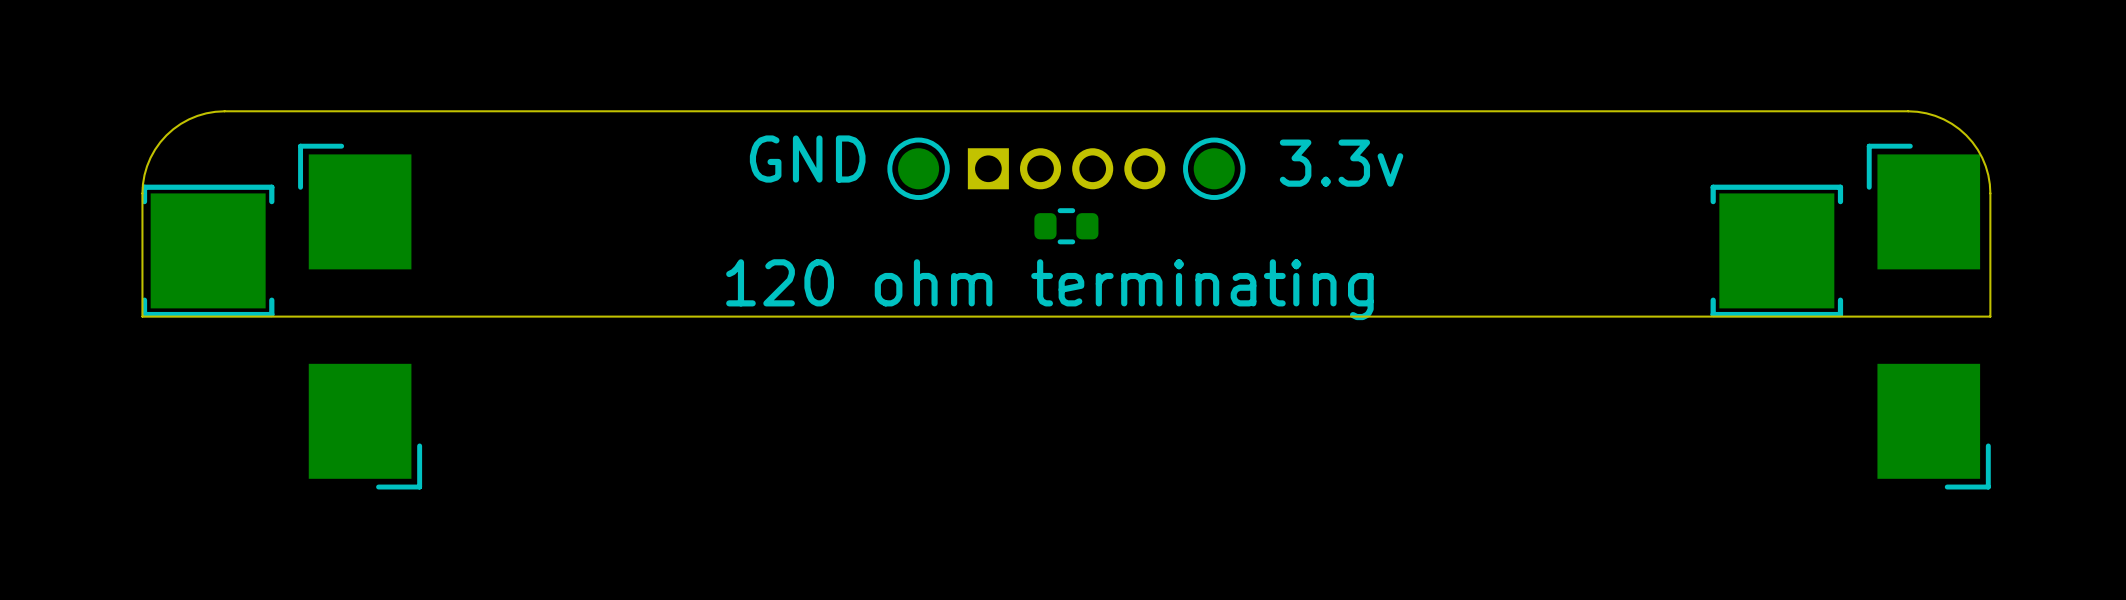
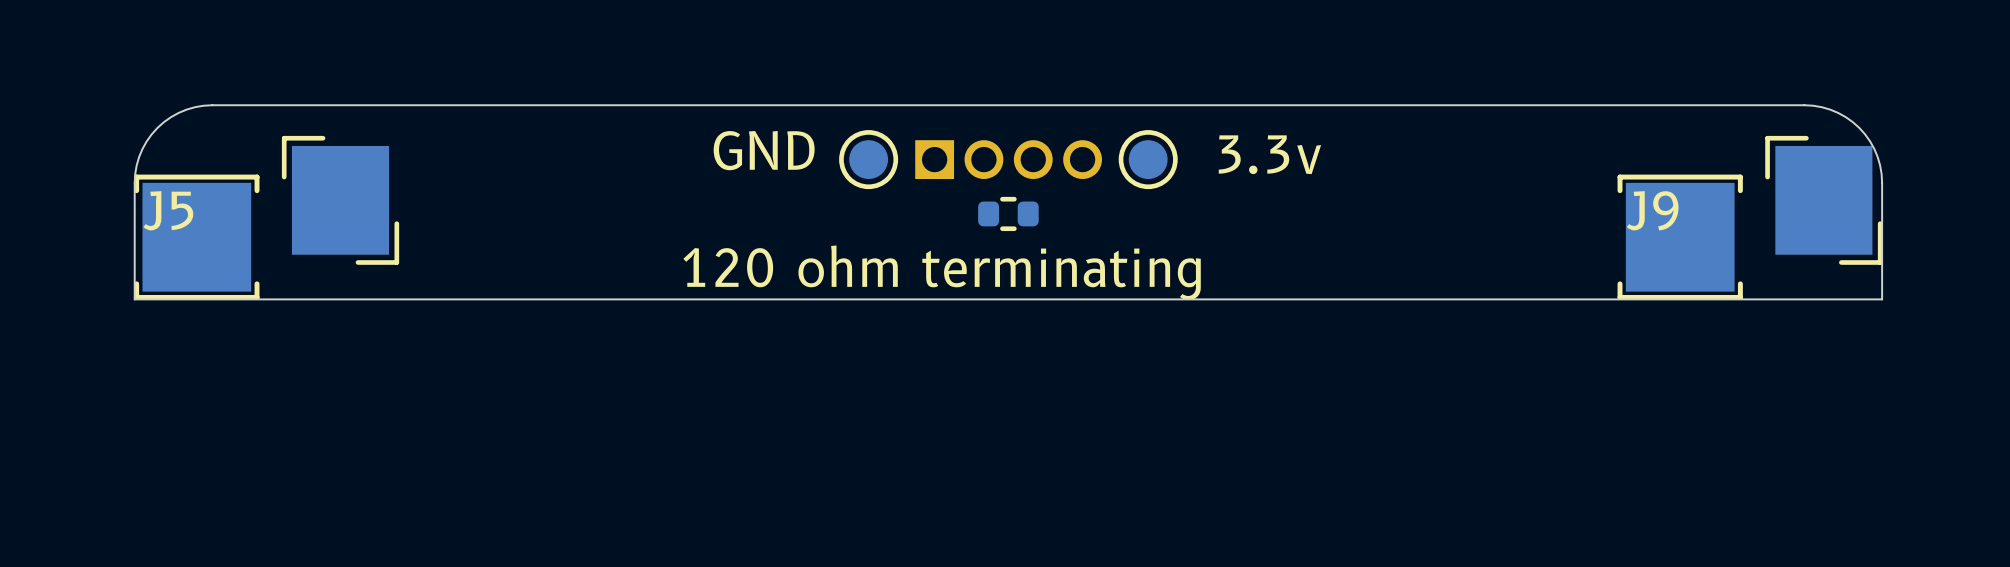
J5: none -> (340, 200)
J9: none -> (1823, 200)
part: (360, 316) -> none
part: (1928, 316) -> none

